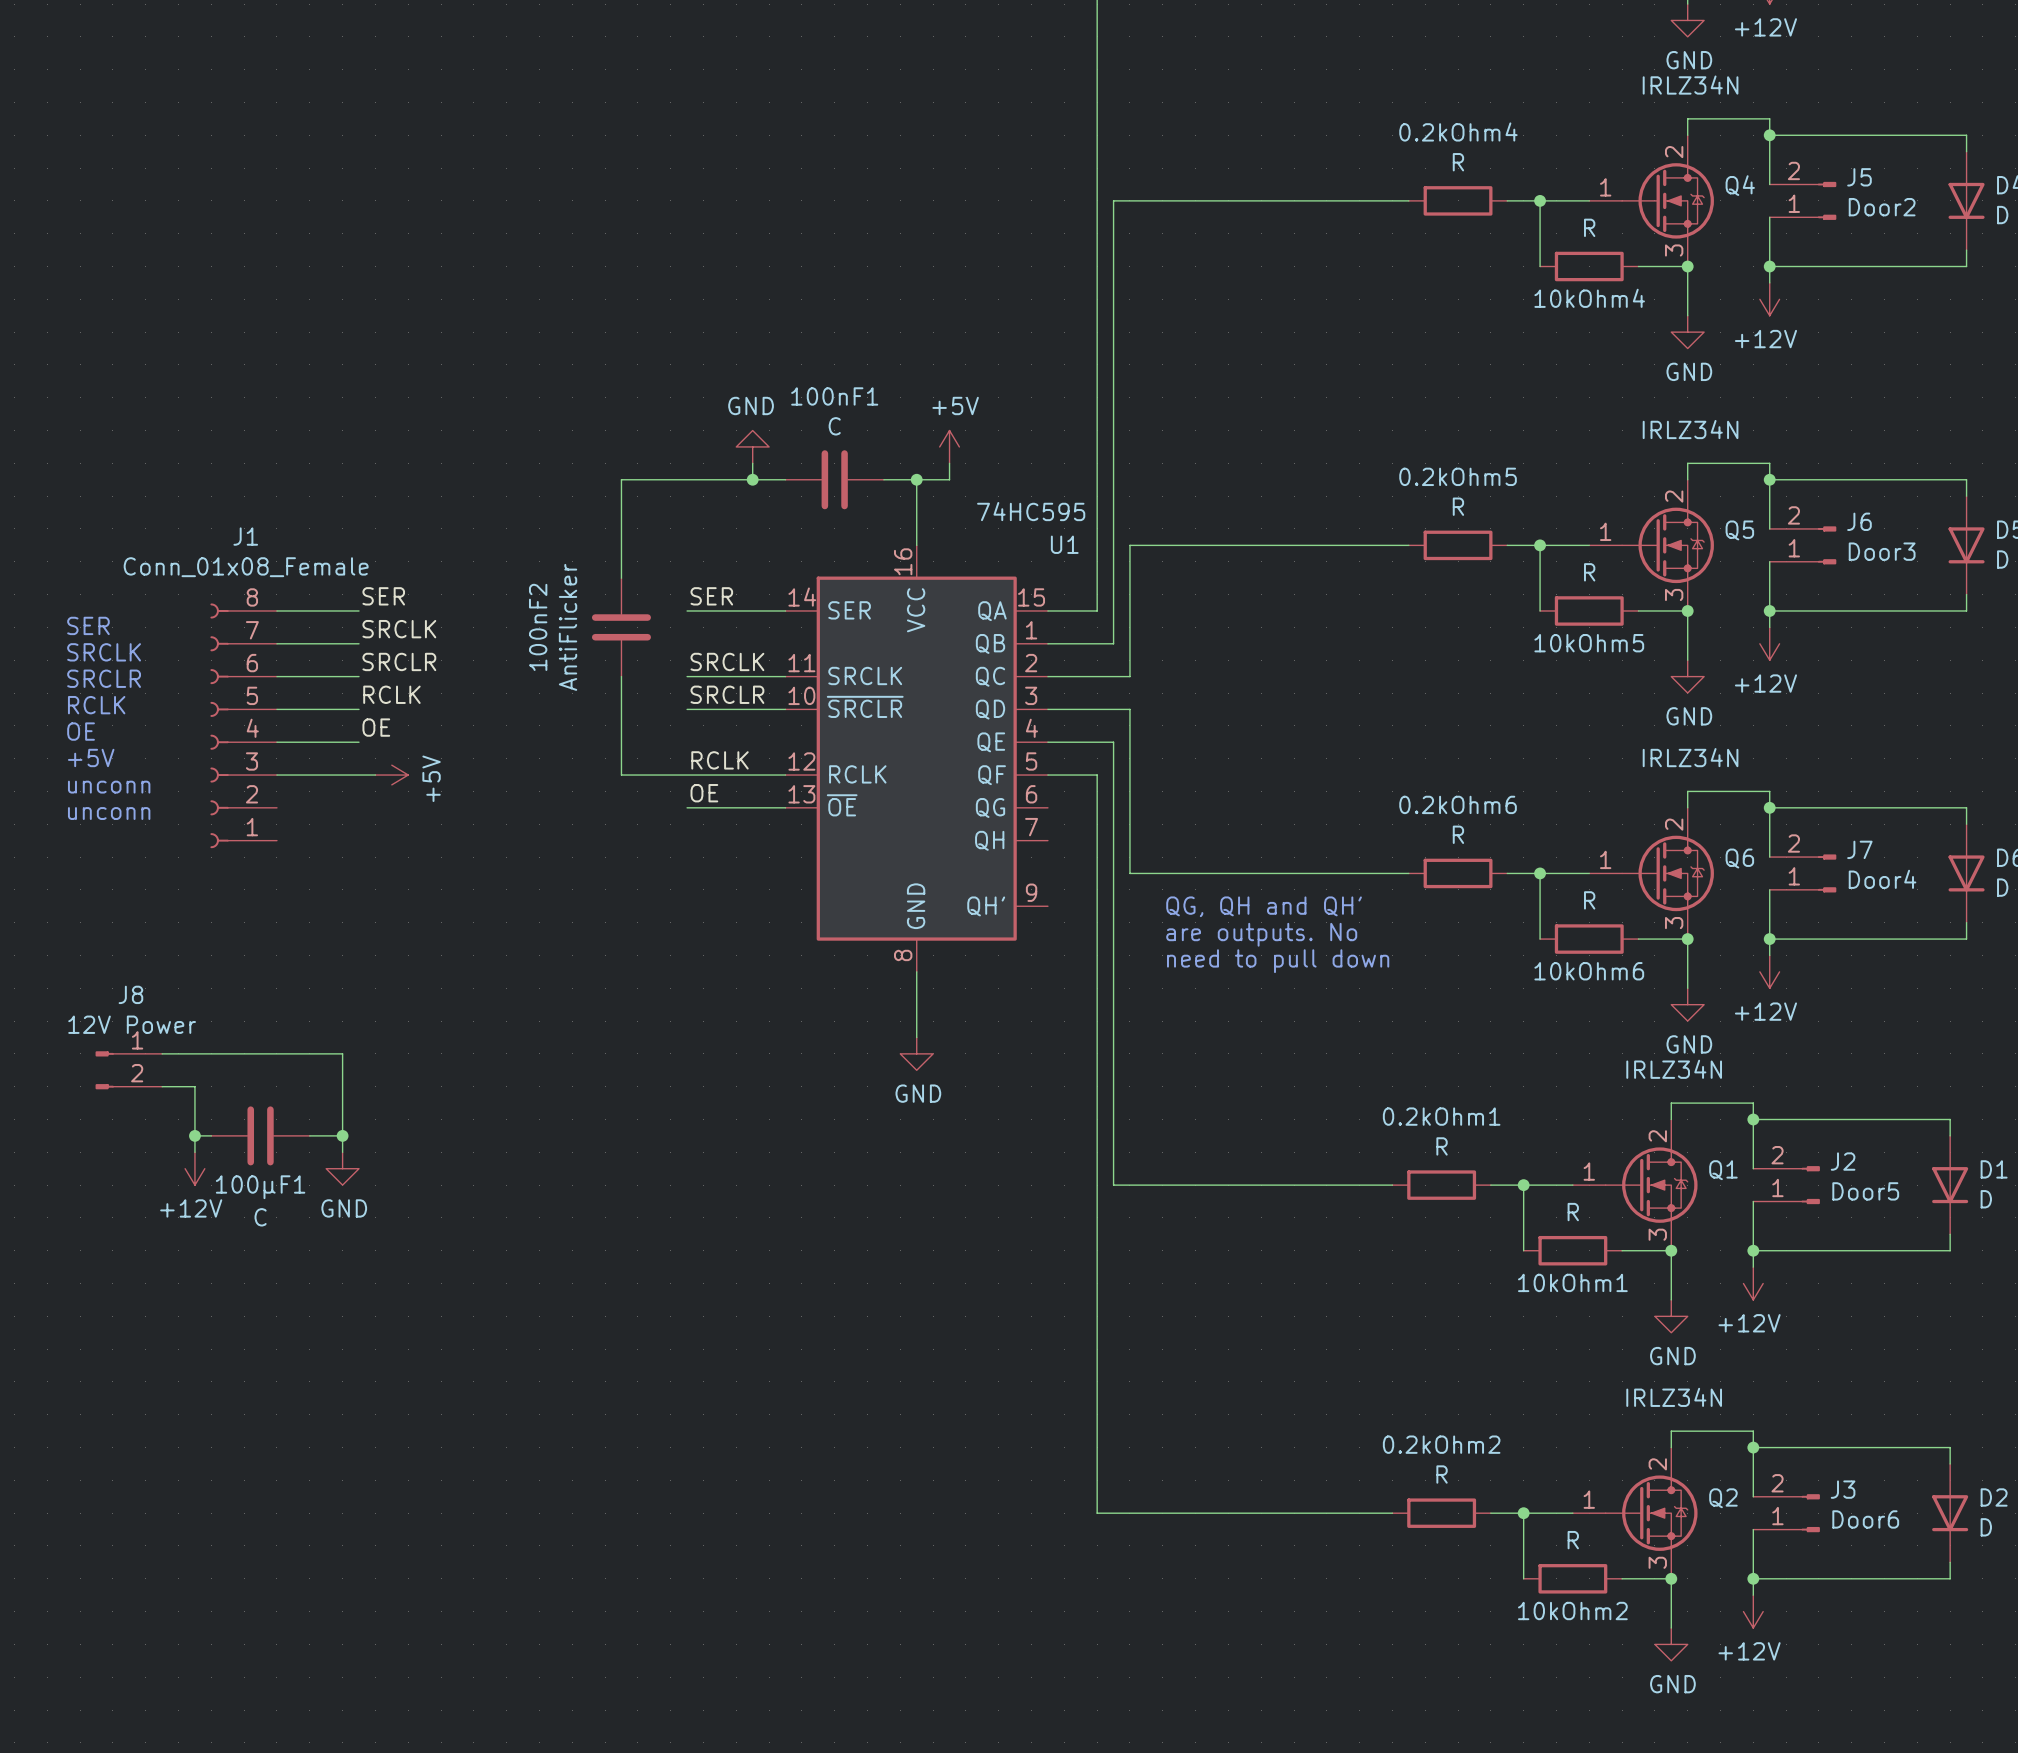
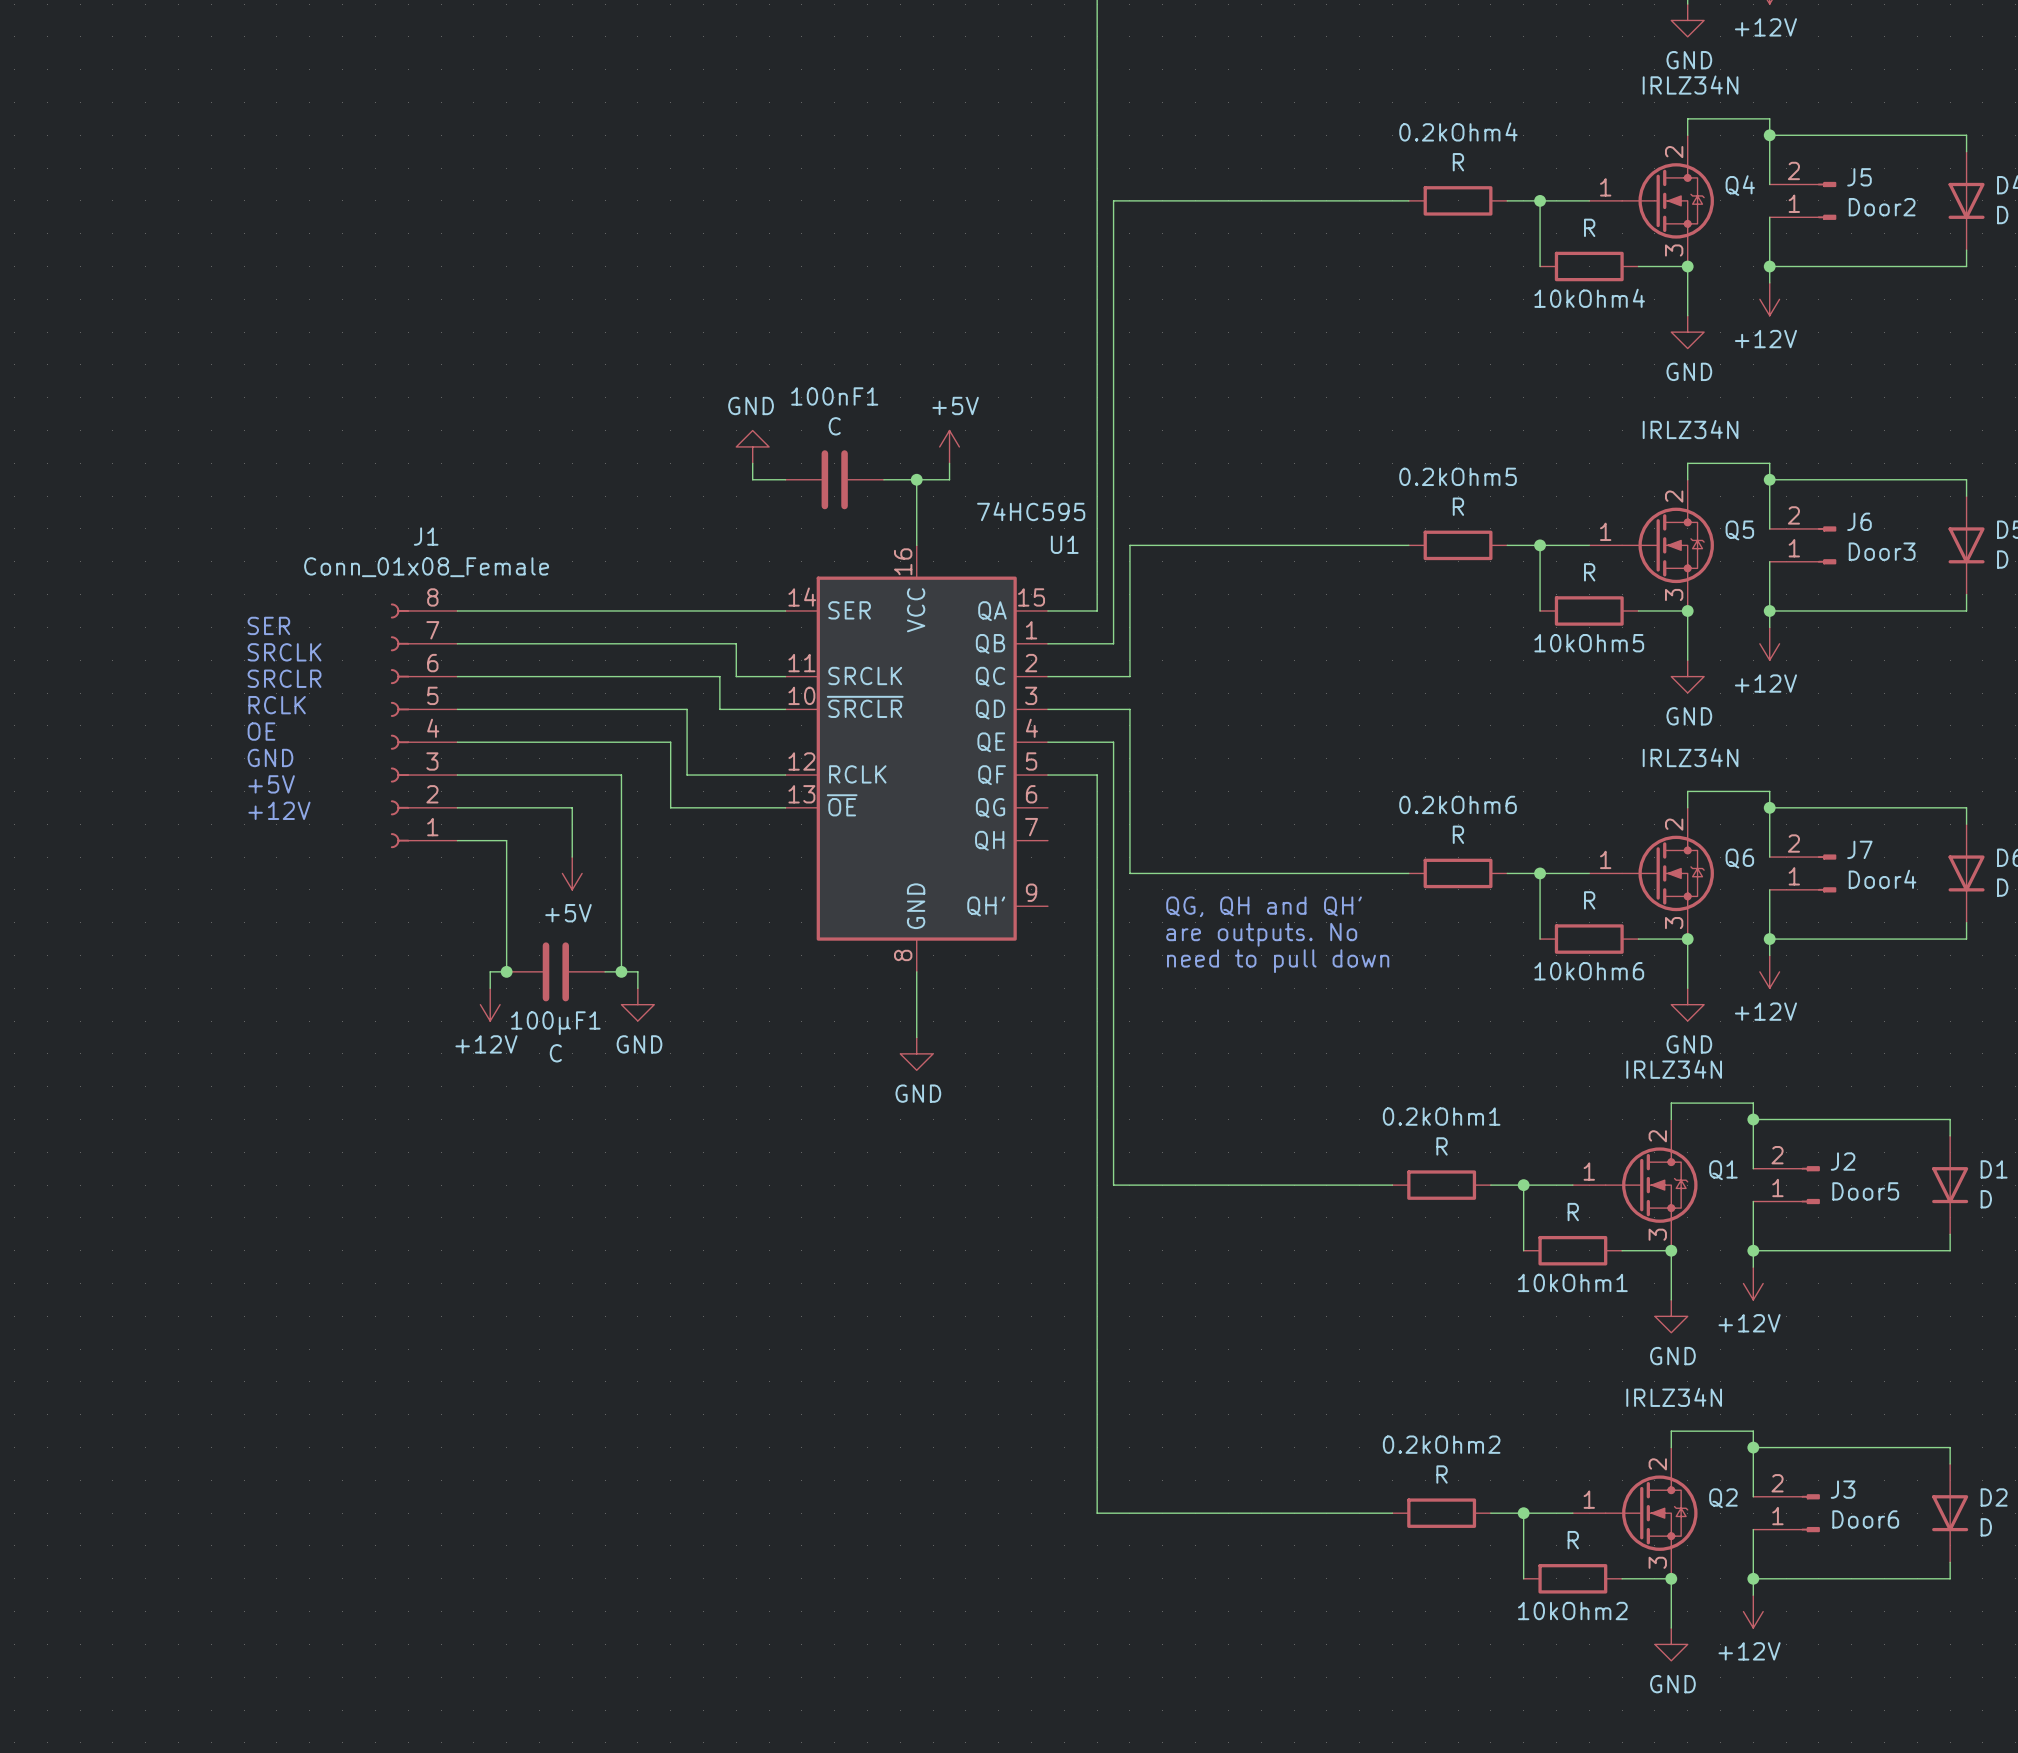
wire: (752, 479) (621, 479) (621, 578) -> none
junction: (752, 479) -> none
label: SER (383, 596) -> none
label: SER (711, 596) -> none
wire: (276, 610) (359, 610) -> none
wire: none -> (457, 610) (687, 610)
text position: SER (88, 625) -> SER (268, 625)
100nF2: AntiFlicker (621, 627) -> none
label: SRCLK (399, 629) -> none
wire: (276, 643) (359, 643) -> none
wire: none -> (457, 643) (736, 643) (736, 676)
text position: SRCLK (104, 652) -> SRCLK (284, 652)
label: SRCLR (399, 661) -> none
label: SRCLK (727, 661) -> none
wire: (276, 676) (359, 676) -> none
wire: none -> (457, 676) (687, 676)
wire: (621, 676) (621, 775) (687, 775) -> (457, 709) (687, 709) (687, 775)
wire: (719, 676) (736, 676) -> (719, 676) (719, 709)
text position: SRCLR (104, 678) -> SRCLR (284, 678)
label: RCLK (391, 694) -> none
label: SRCLR (727, 694) -> none
text position: RCLK (96, 705) -> RCLK (277, 705)
wire: (276, 709) (359, 709) -> none
wire: (687, 709) (719, 709) -> none
J1 position: (243, 725) -> (424, 725)
label: OE (376, 727) -> none
text position: OE (81, 731) -> OE (261, 731)
wire: (276, 742) (359, 742) -> none
wire: none -> (457, 742) (670, 742) (670, 807) (687, 807)
text position: +5V (91, 757) -> +5V (271, 784)
text: none -> GND (270, 757)
label: RCLK (720, 760) -> none
wire: (276, 775) (375, 775) -> none
power symbol rotation: 0° (391, 775) -> 90° clockwise (572, 873)
power symbol position: +5V (391, 775) -> +5V (572, 873)
wire: none -> (457, 775) (621, 775) (621, 971)
text: unconn (109, 787) -> none
label: OE (704, 793) -> none
wire: none -> (457, 807) (572, 807) (572, 857)
text: none -> +12V (279, 810)
text: unconn (109, 813) -> none
wire: none -> (457, 840) (506, 840) (506, 971) (490, 971) (490, 988)
junction: none -> (506, 971)
wire: none -> (605, 971) (637, 971) (637, 988)
junction: none -> (621, 971)
power symbol: none -> +12V (490, 1004)
power symbol: none -> GND (637, 1004)
wire: (162, 1053) (342, 1053) (342, 1152) -> none
J8: 12V Power (128, 1070) -> none
wire: (162, 1086) (194, 1086) (194, 1152) -> none
wire: (194, 1135) (211, 1135) -> none
junction: (194, 1135) -> none
100µF1 position: (260, 1135) -> (555, 971)
wire: (309, 1135) (342, 1135) -> none
junction: (342, 1135) -> none
power symbol: +12V (194, 1168) -> none
power symbol: GND (342, 1168) -> none

